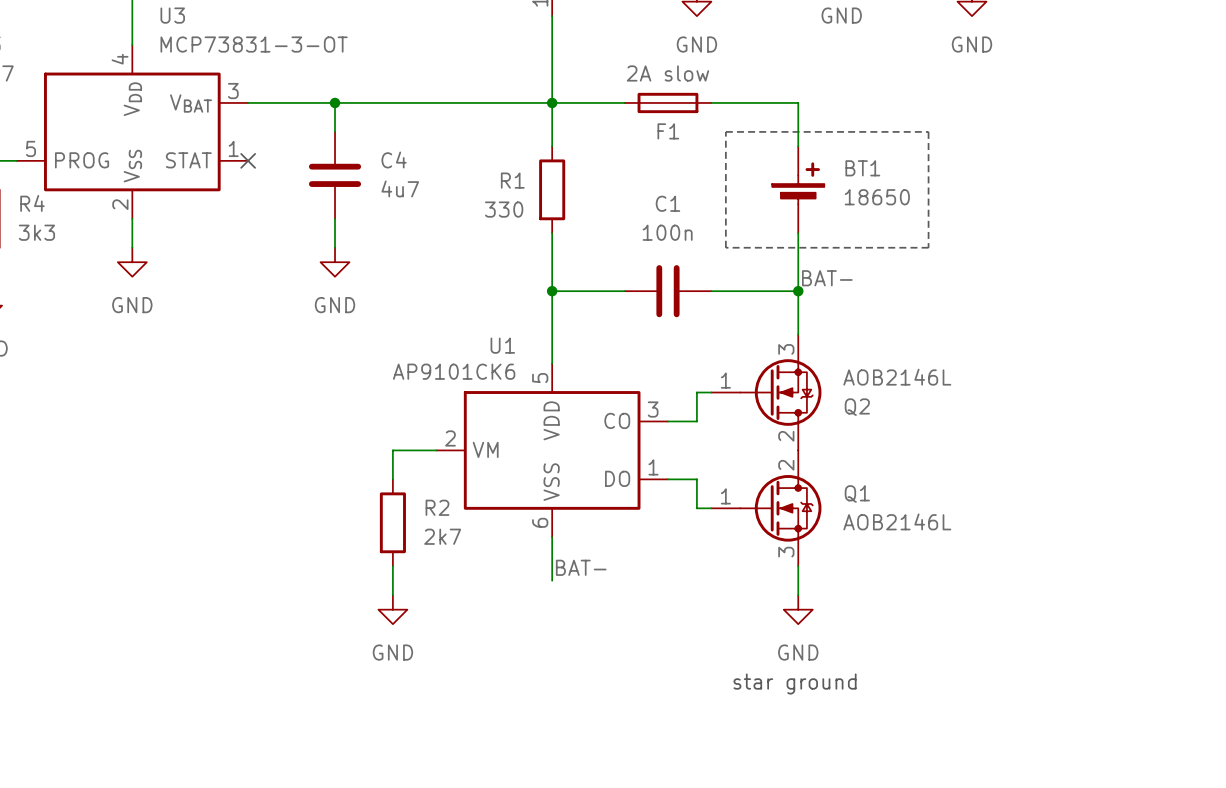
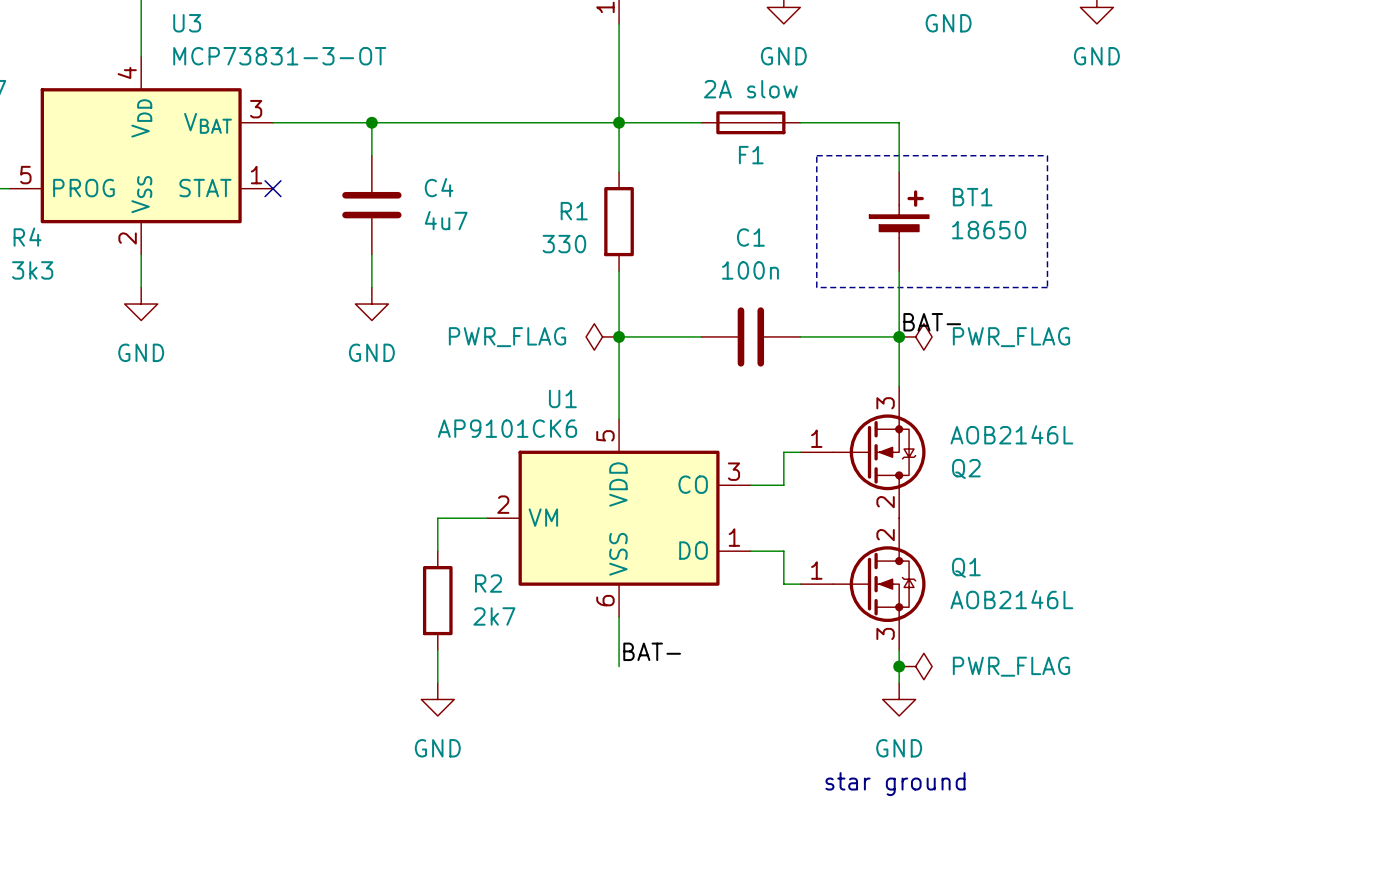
power symbol: none -> PWR_FLAG (602, 336)
power symbol: none -> PWR_FLAG (915, 336)
junction: none -> (899, 666)
power symbol: none -> PWR_FLAG (915, 666)

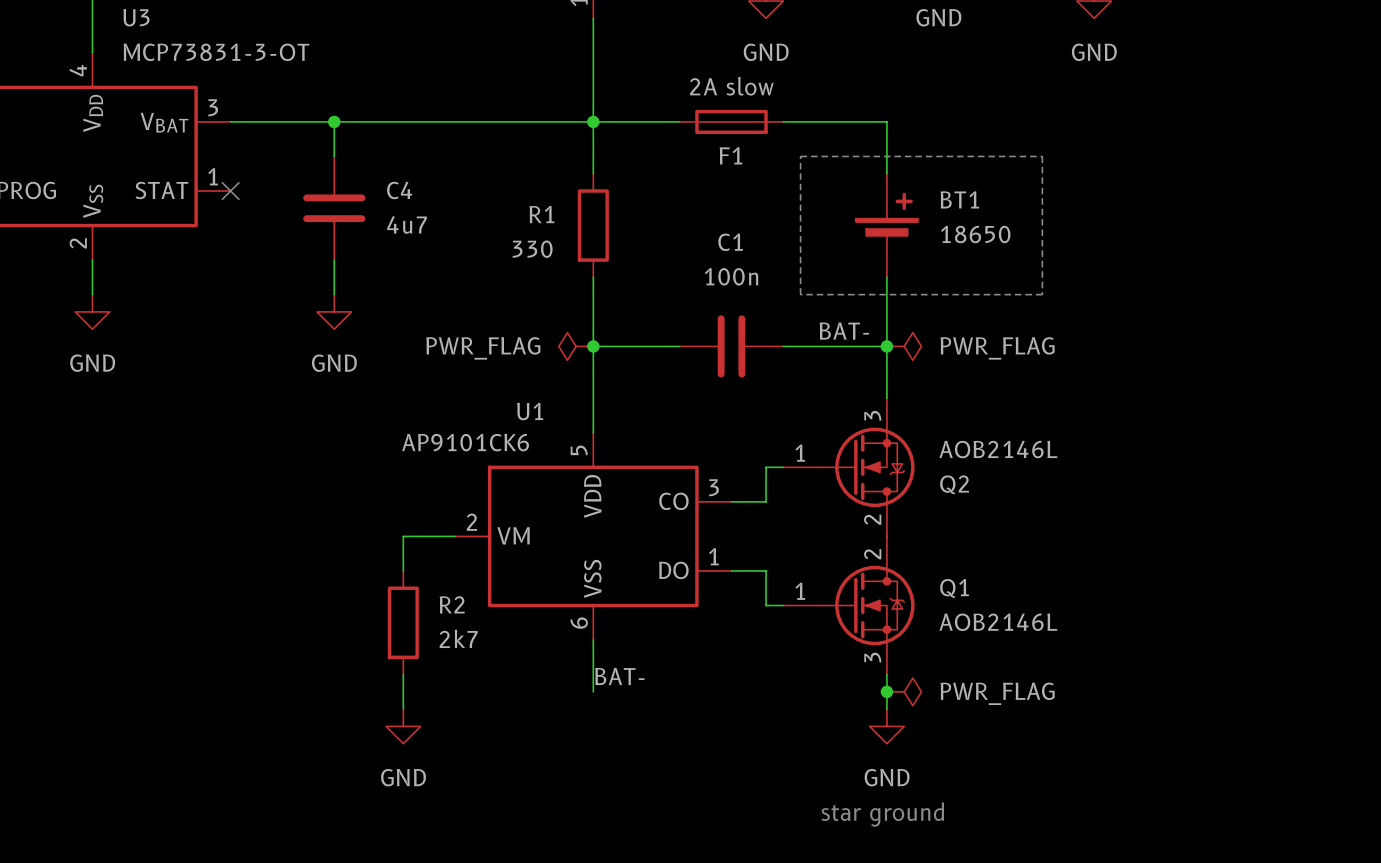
label position: BAT- (932, 322) -> BAT- (844, 331)

